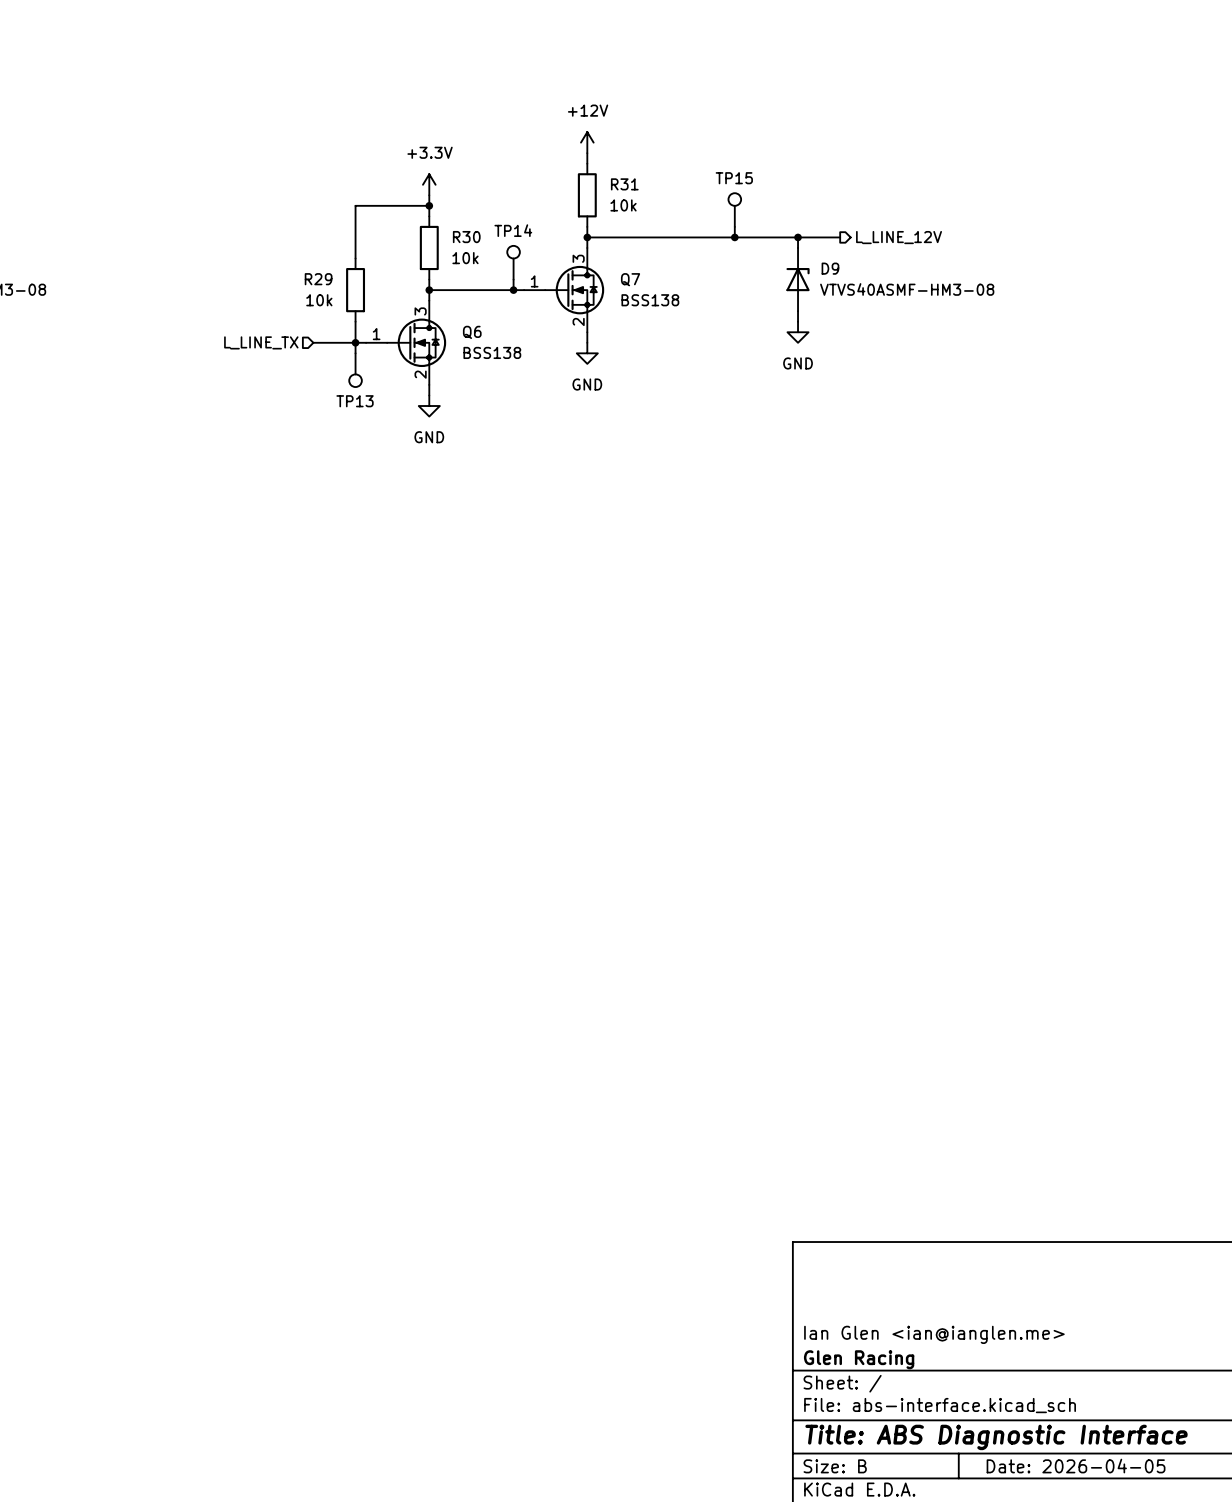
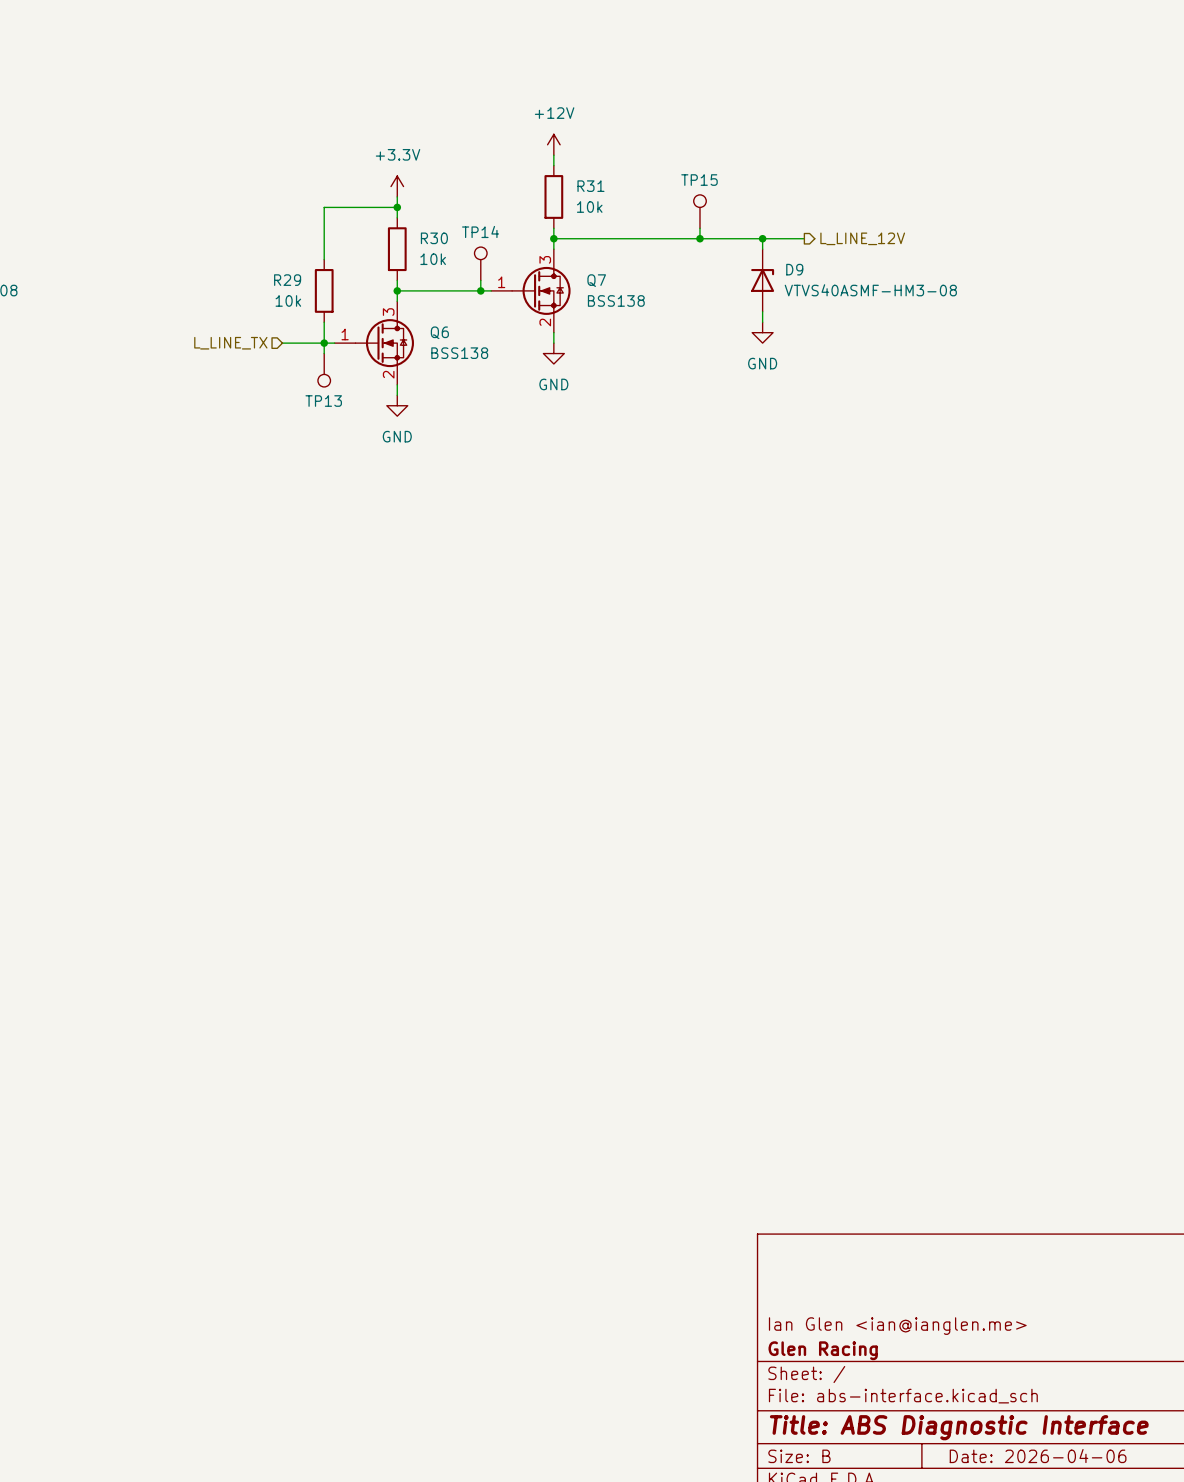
title block: Date: 2026-04-05 (1076, 1466) -> Date: 2026-04-06 (1038, 1456)

